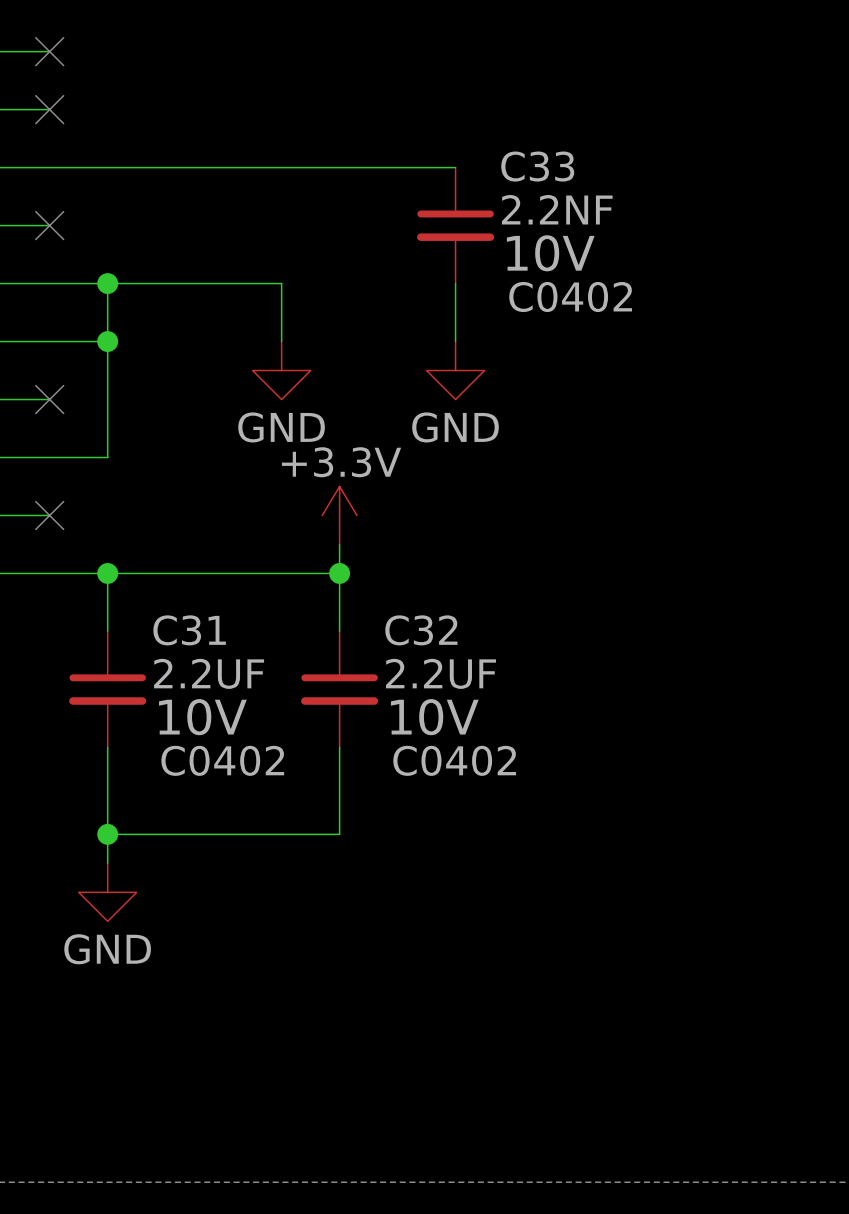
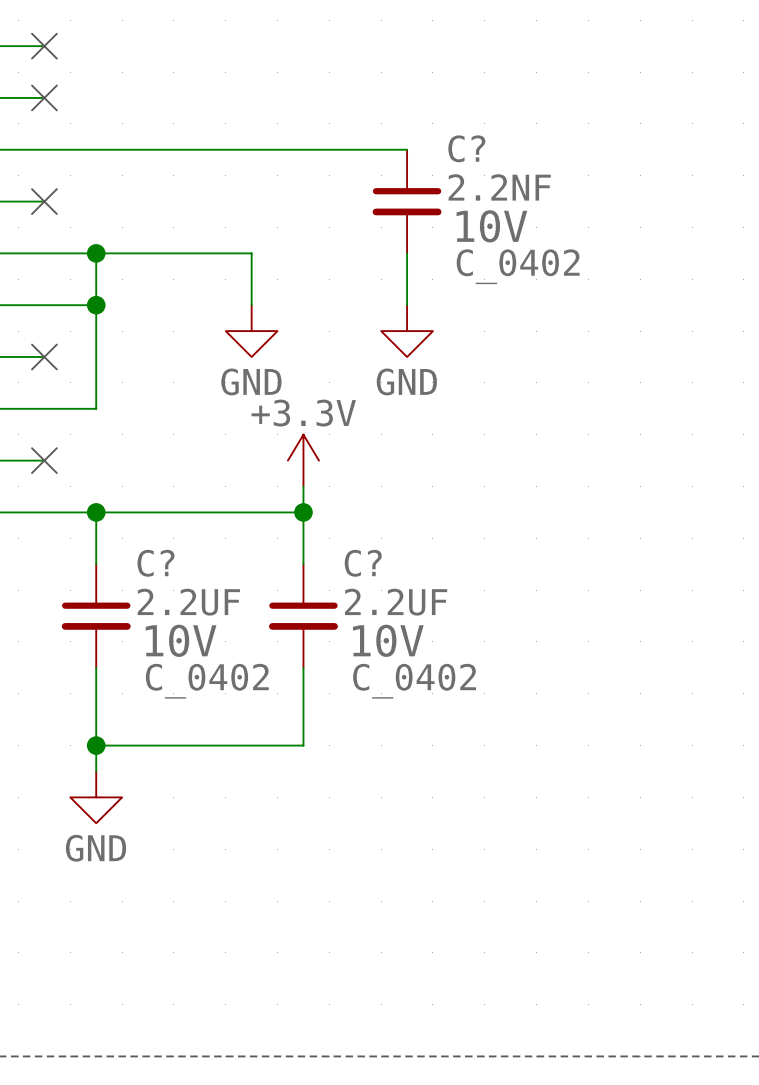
C33 name: C33 (537, 166) -> C? (466, 148)
C33 text: C0402 (570, 296) -> C_0402 (518, 266)
C31 name: C31 (189, 630) -> C? (156, 563)
C32 name: C32 (421, 630) -> C? (363, 563)
C31 text: C0402 (222, 760) -> C_0402 (207, 681)
C32 text: C0402 (454, 760) -> C_0402 (414, 681)

